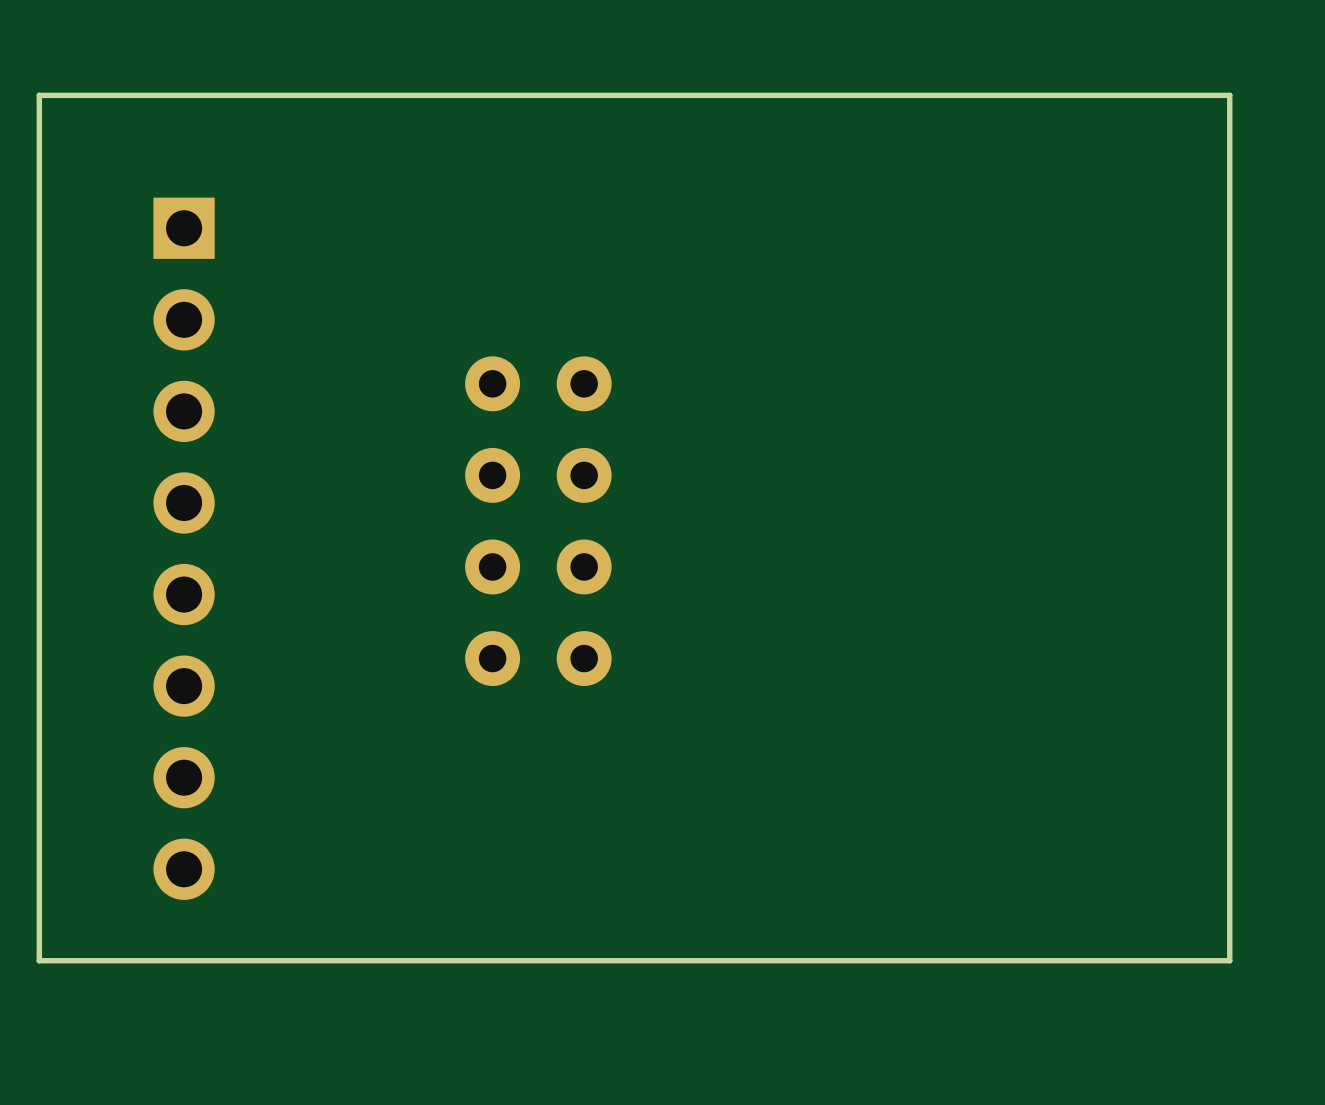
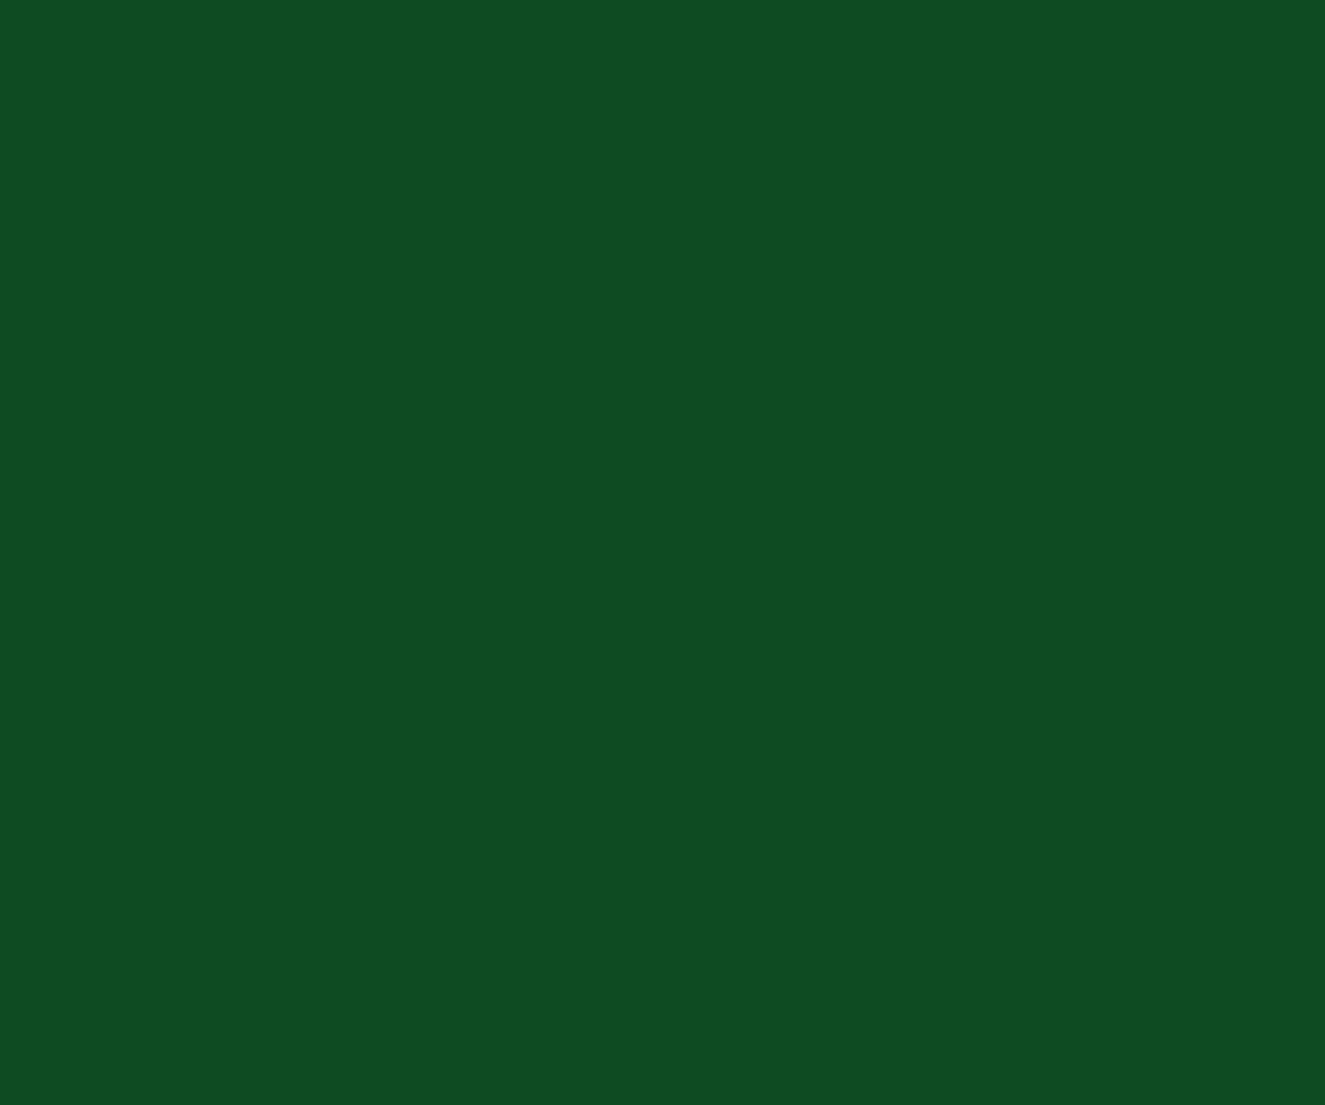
board edge: (1229, 95) (1229, 960) (39, 960) (39, 95) (1229, 95) -> none
part: (538, 521) -> none
part: (184, 548) -> none

